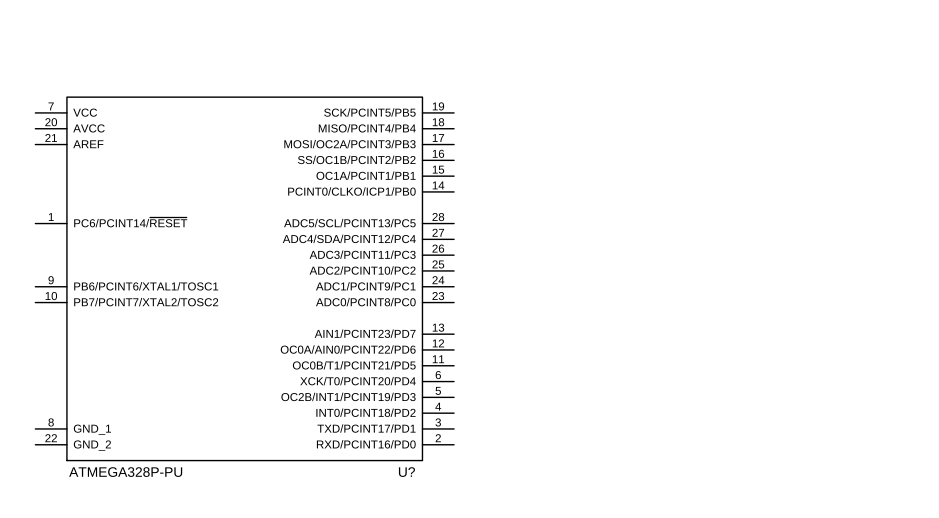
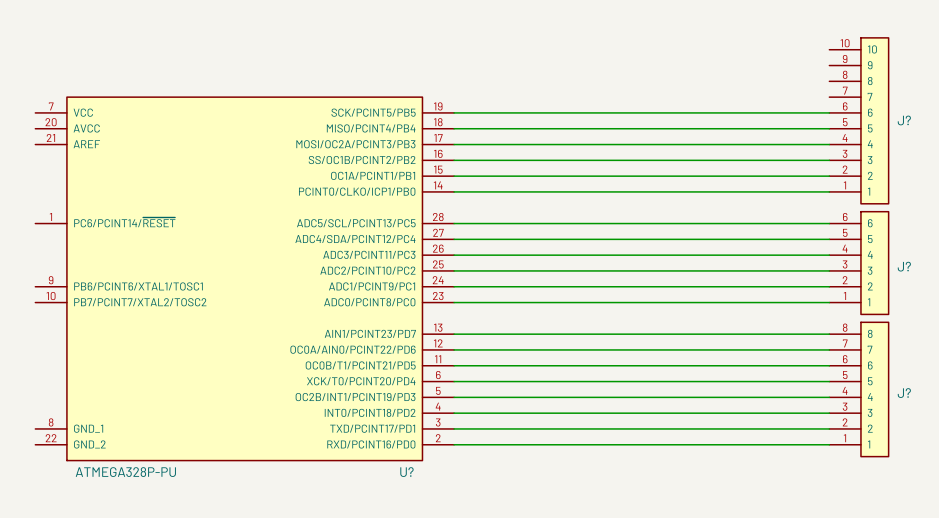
wire: none -> (454, 112) (829, 112)
J?: none -> (858, 120)
wire: none -> (454, 128) (829, 128)
wire: none -> (454, 144) (829, 144)
wire: none -> (454, 160) (829, 160)
wire: none -> (454, 176) (829, 176)
wire: none -> (454, 191) (829, 191)
wire: none -> (454, 223) (829, 223)
wire: none -> (454, 239) (829, 239)
wire: none -> (454, 255) (829, 255)
J?: none -> (858, 263)
wire: none -> (454, 270) (829, 270)
wire: none -> (454, 286) (829, 286)
wire: none -> (454, 302) (829, 302)
wire: none -> (454, 334) (829, 334)
wire: none -> (454, 349) (829, 349)
wire: none -> (454, 365) (829, 365)
wire: none -> (454, 381) (829, 381)
J?: none -> (858, 389)
wire: none -> (454, 397) (829, 397)
wire: none -> (454, 413) (829, 413)
wire: none -> (454, 428) (829, 428)
wire: none -> (454, 444) (829, 444)

